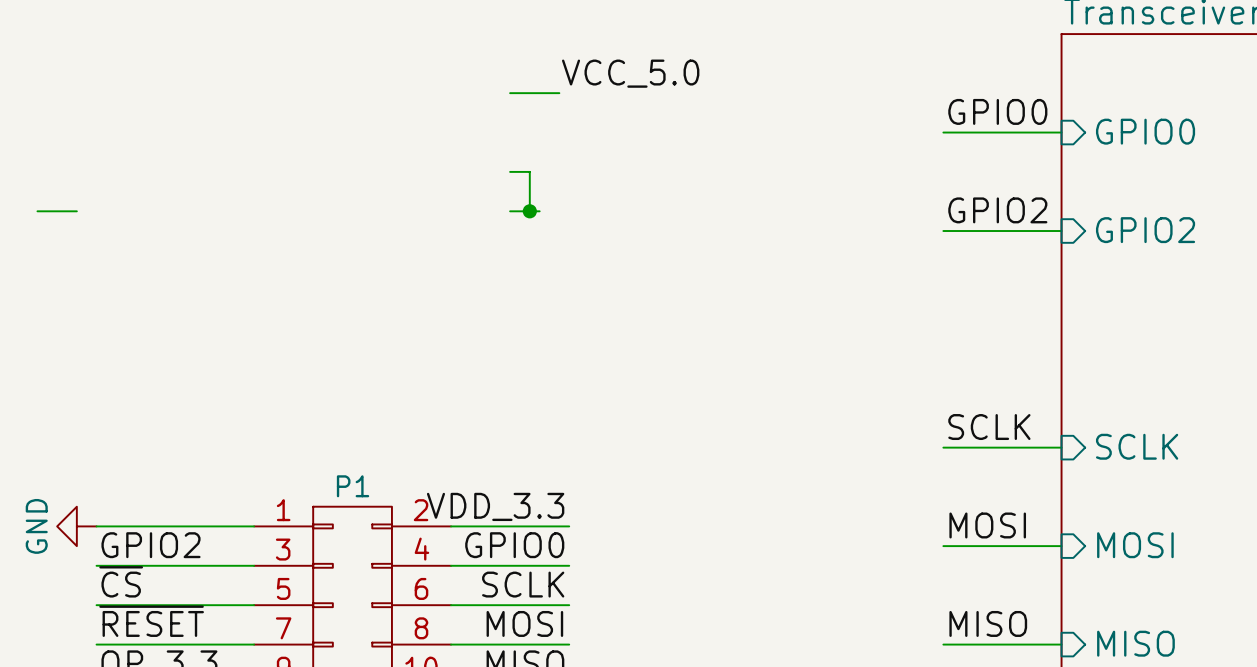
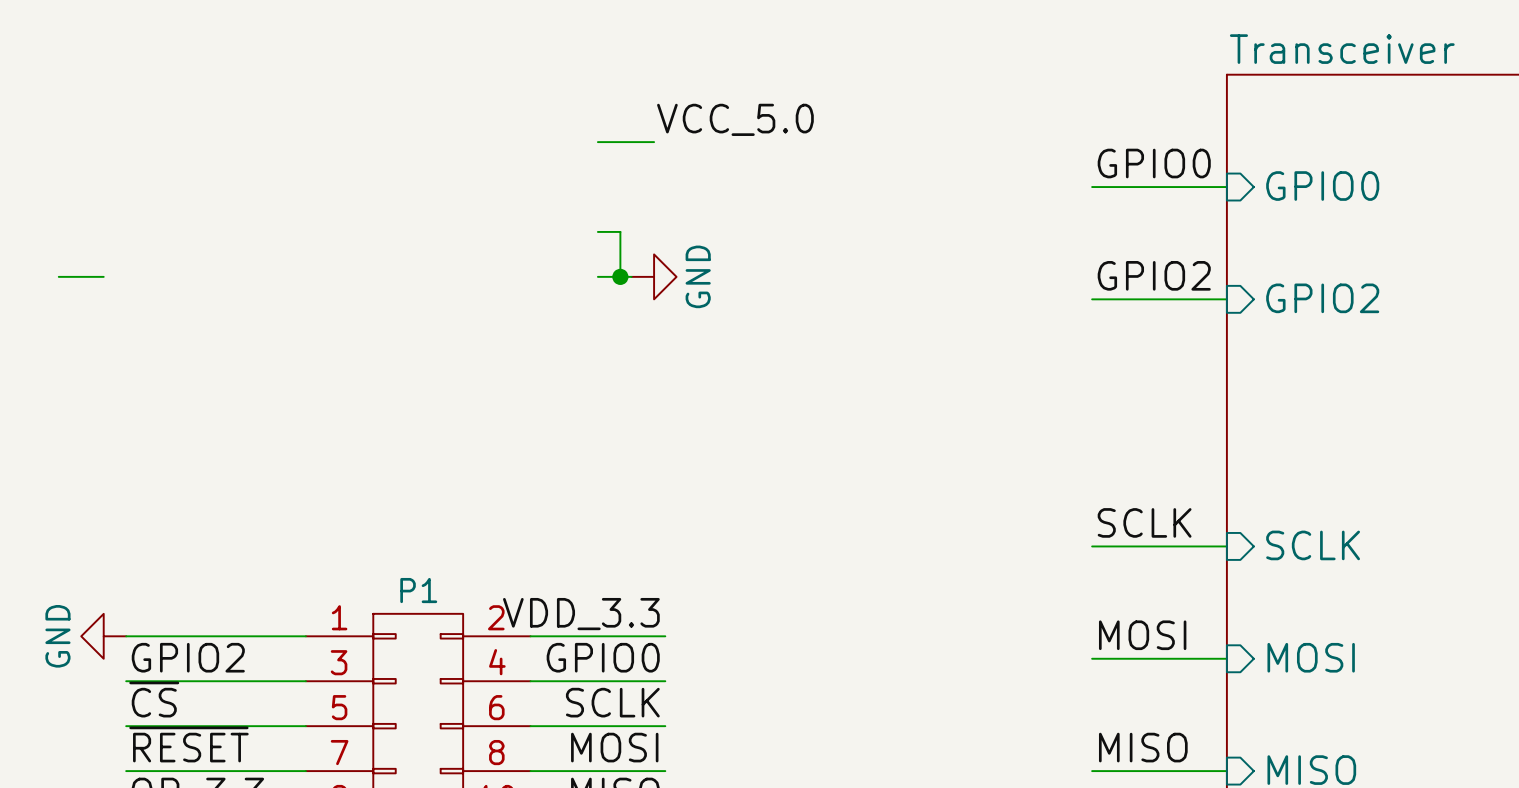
power symbol: none -> GND (654, 276)

